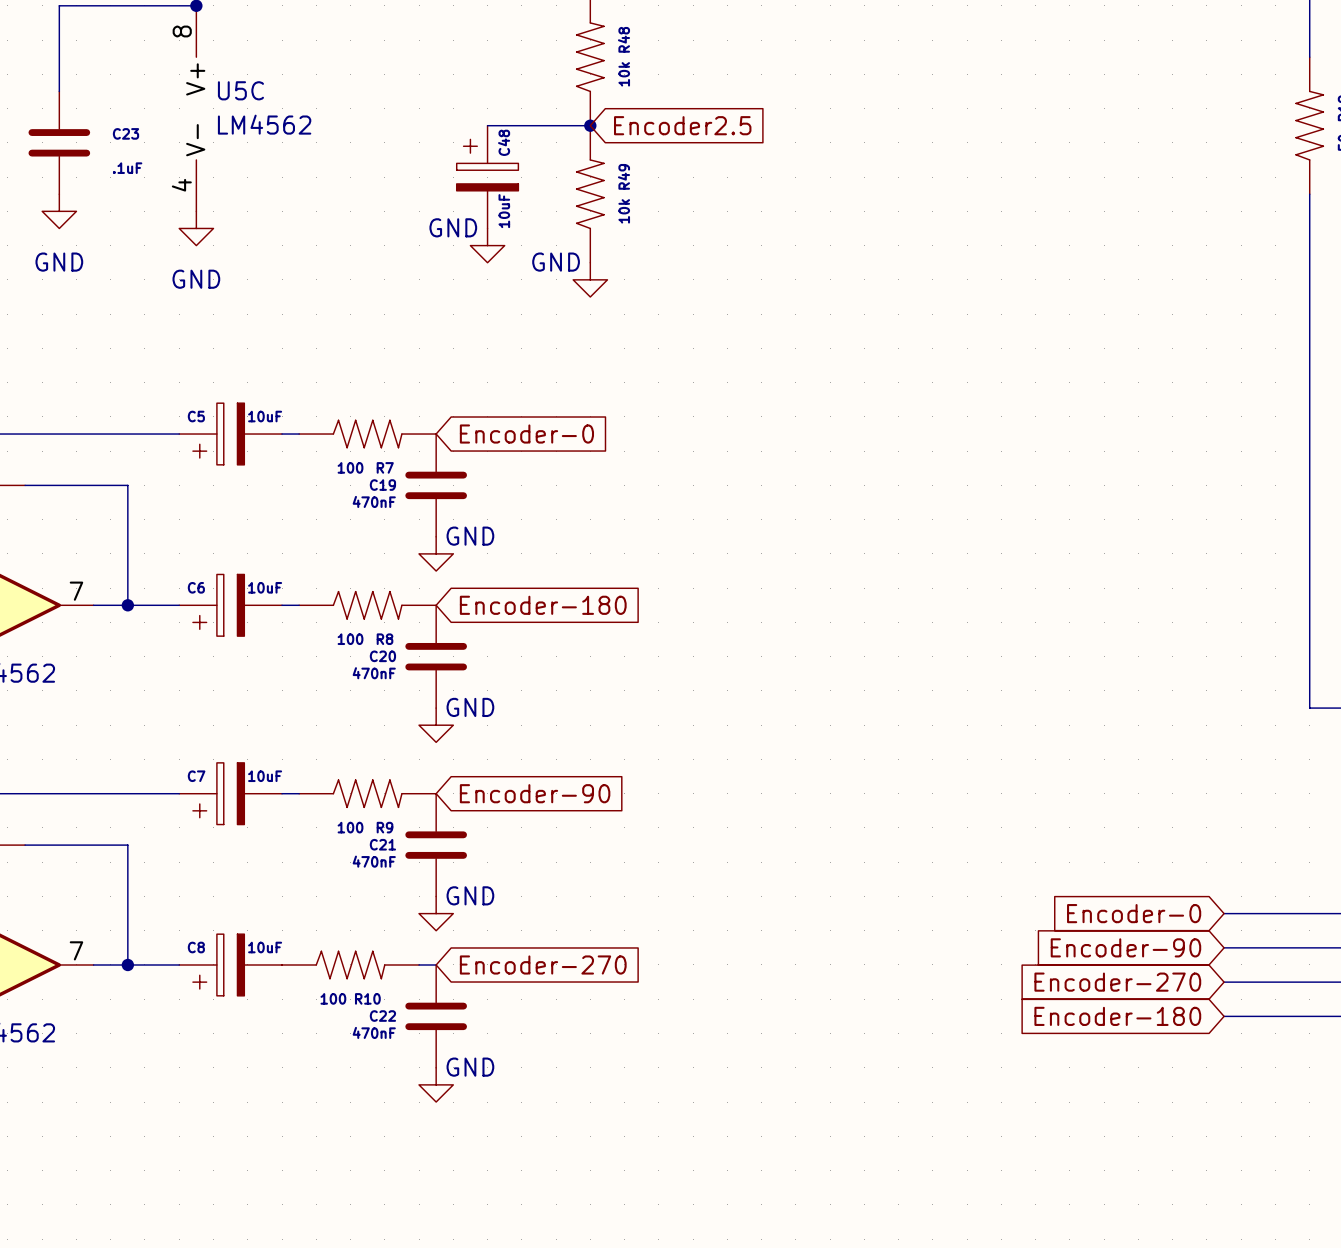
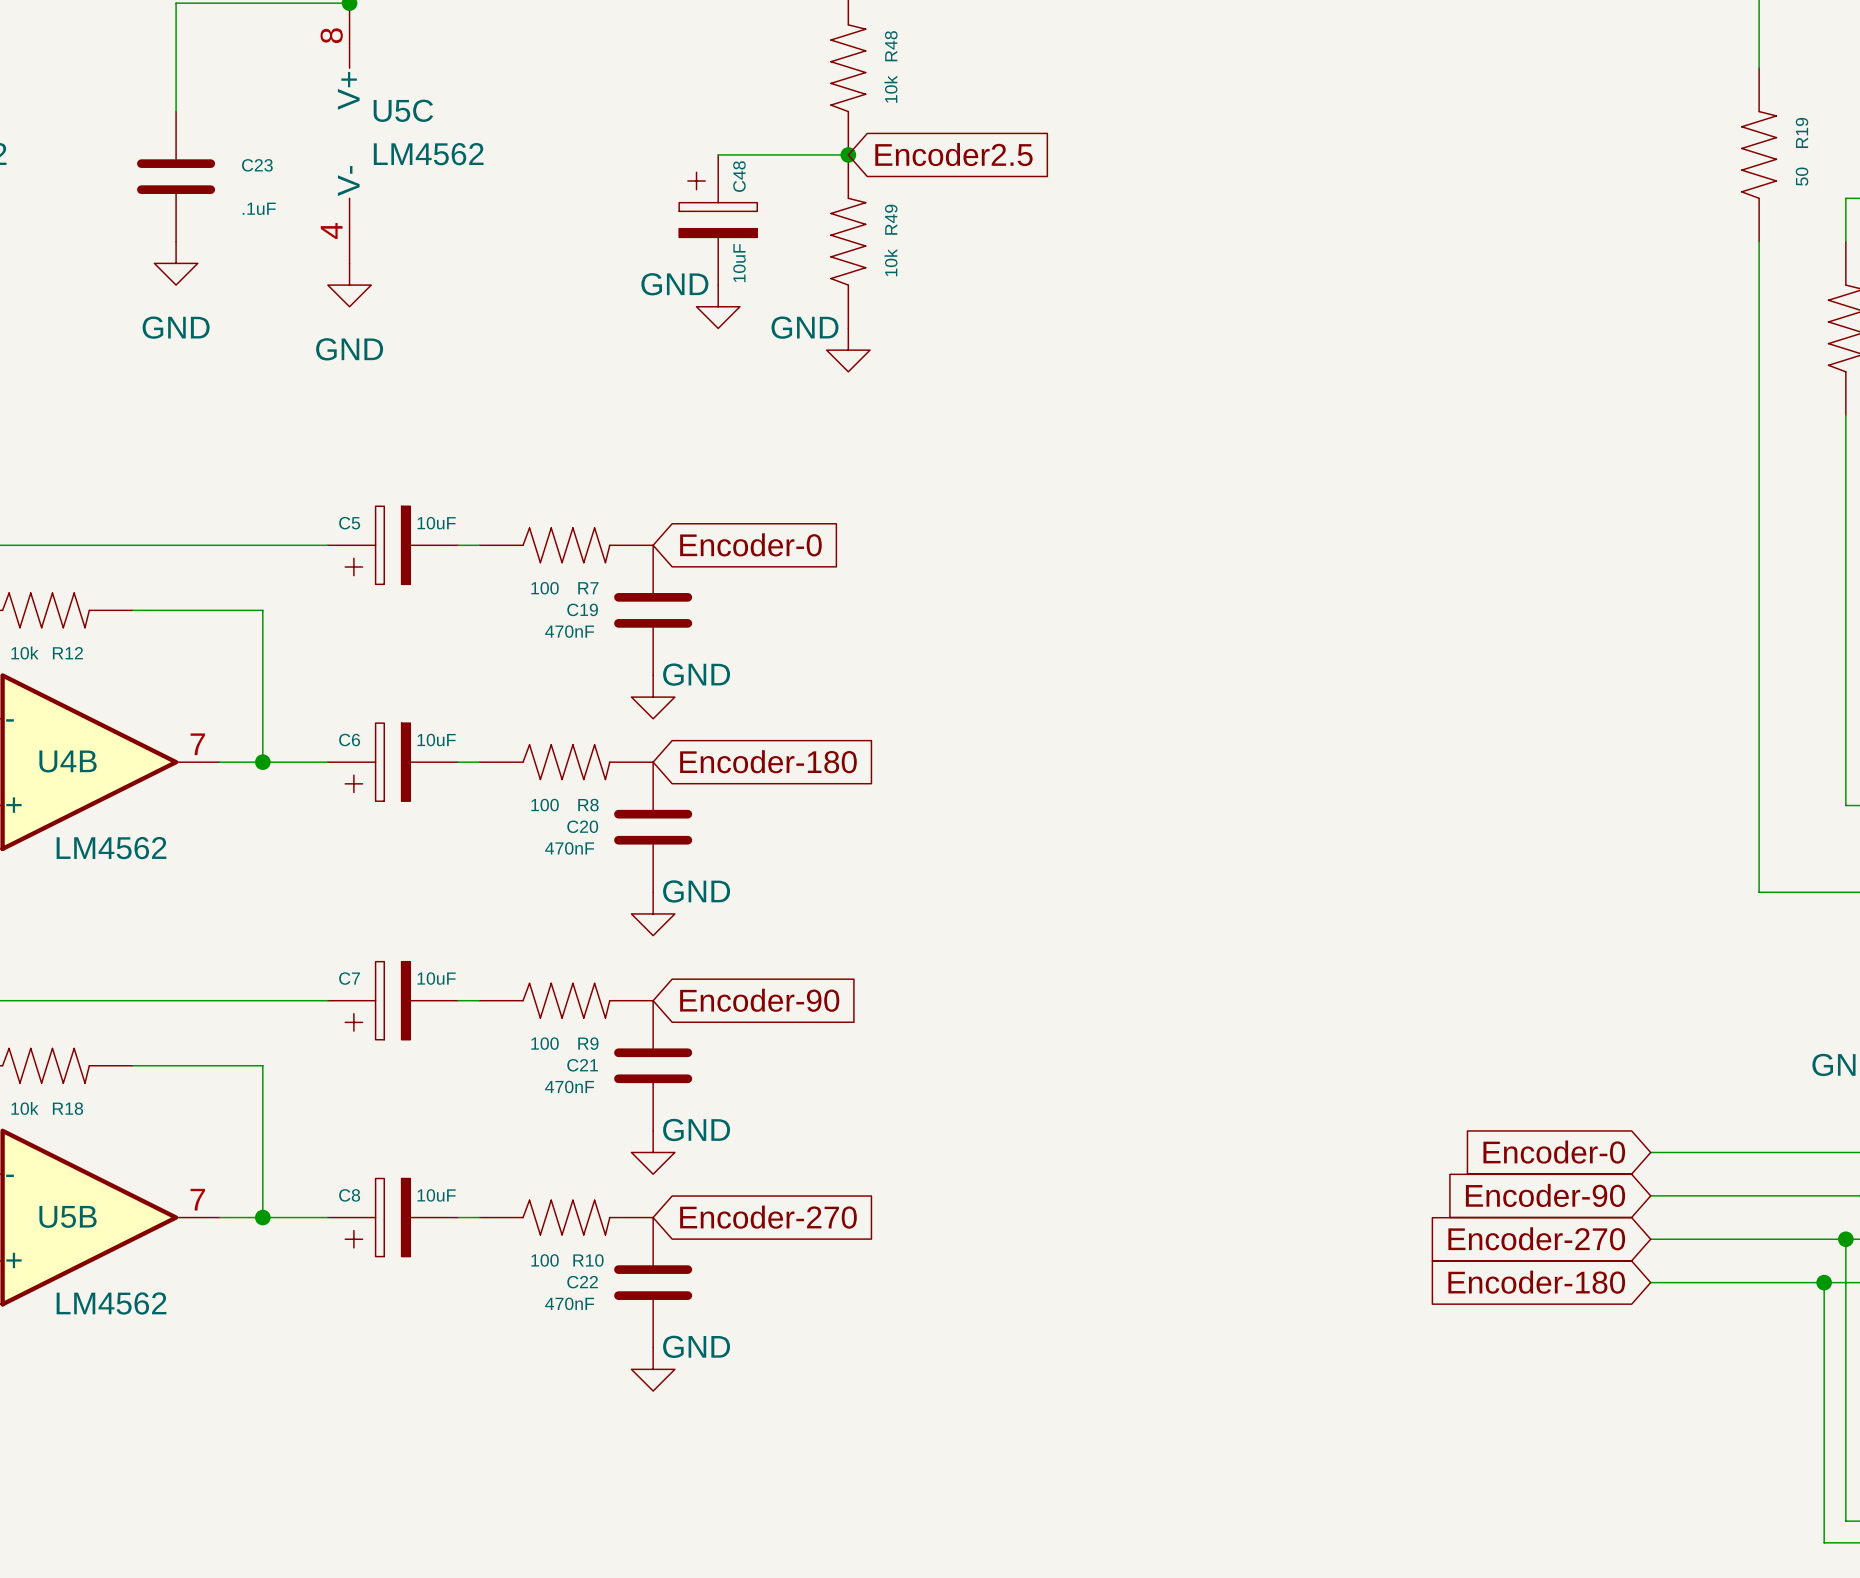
R10 position: (350, 964) -> (566, 1217)

